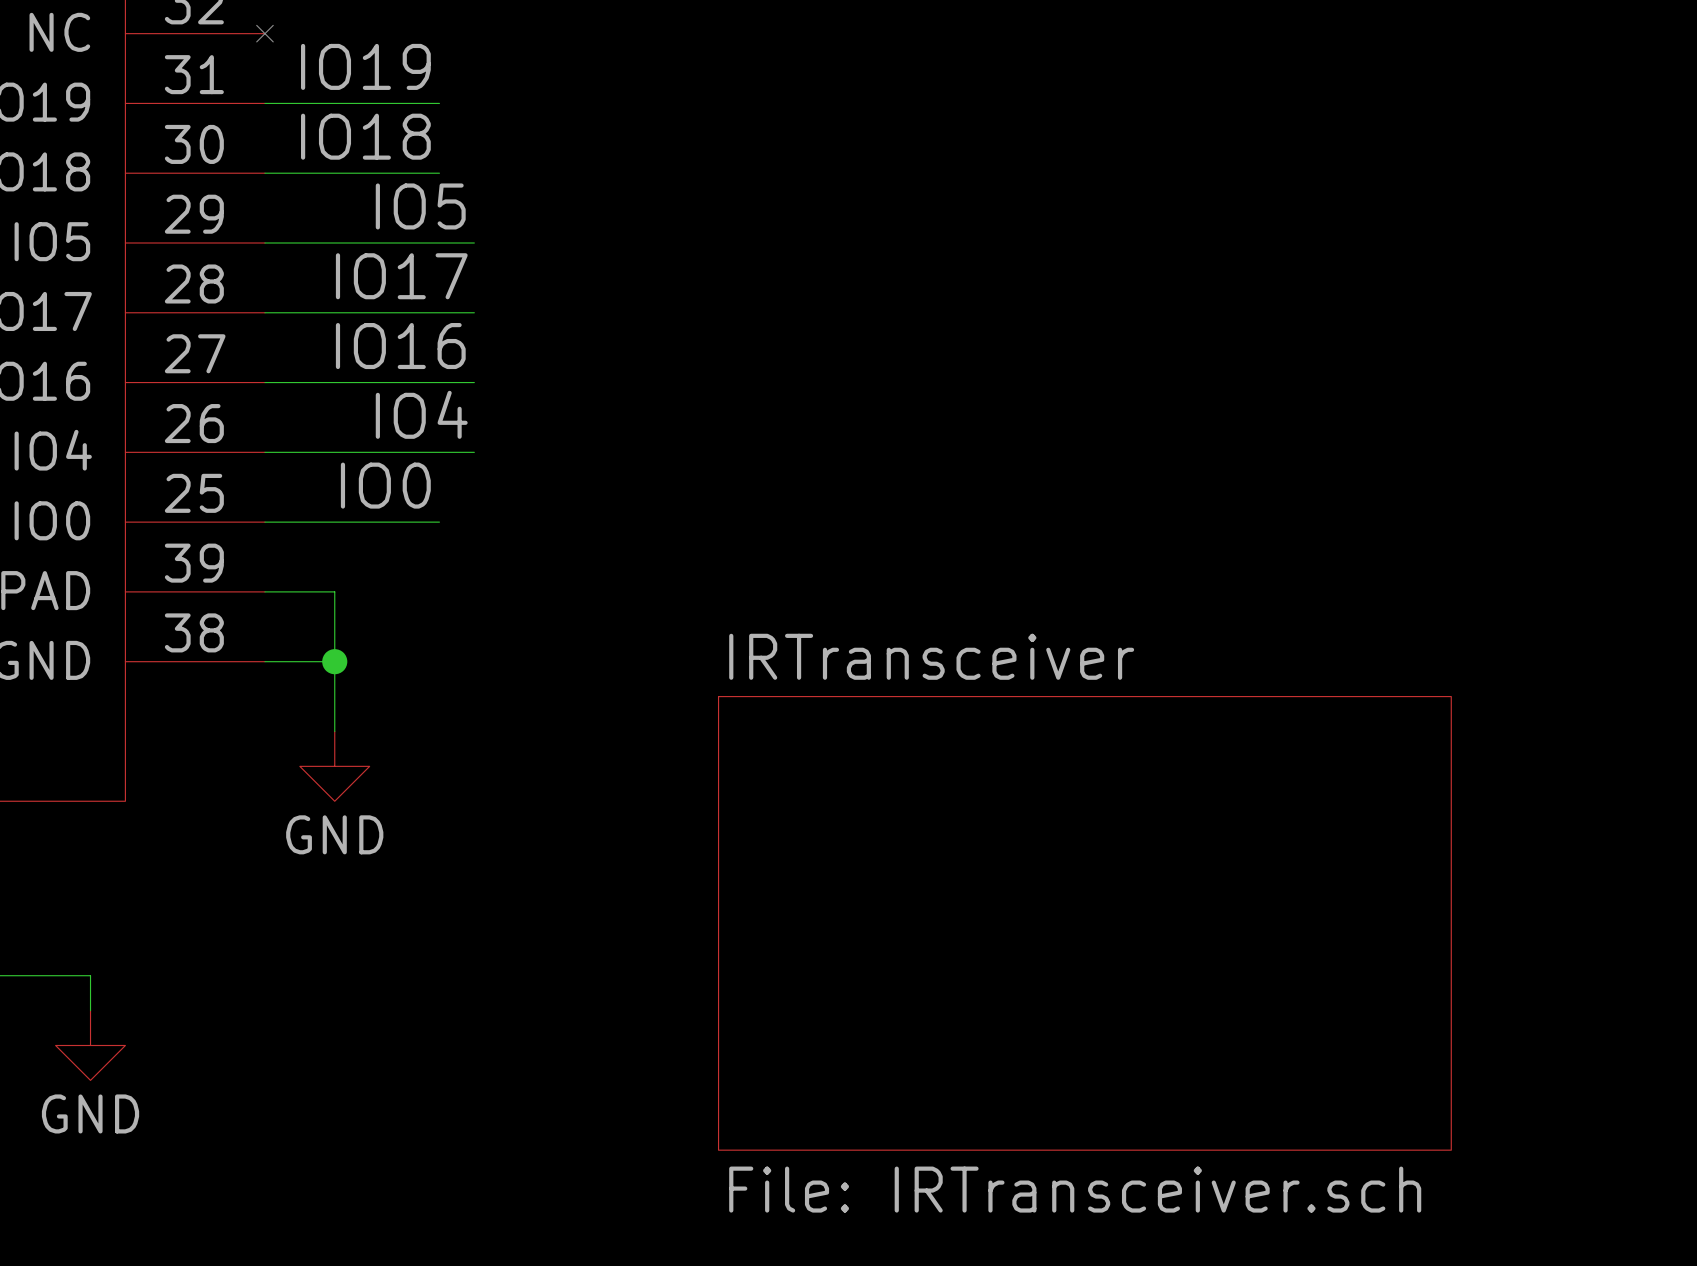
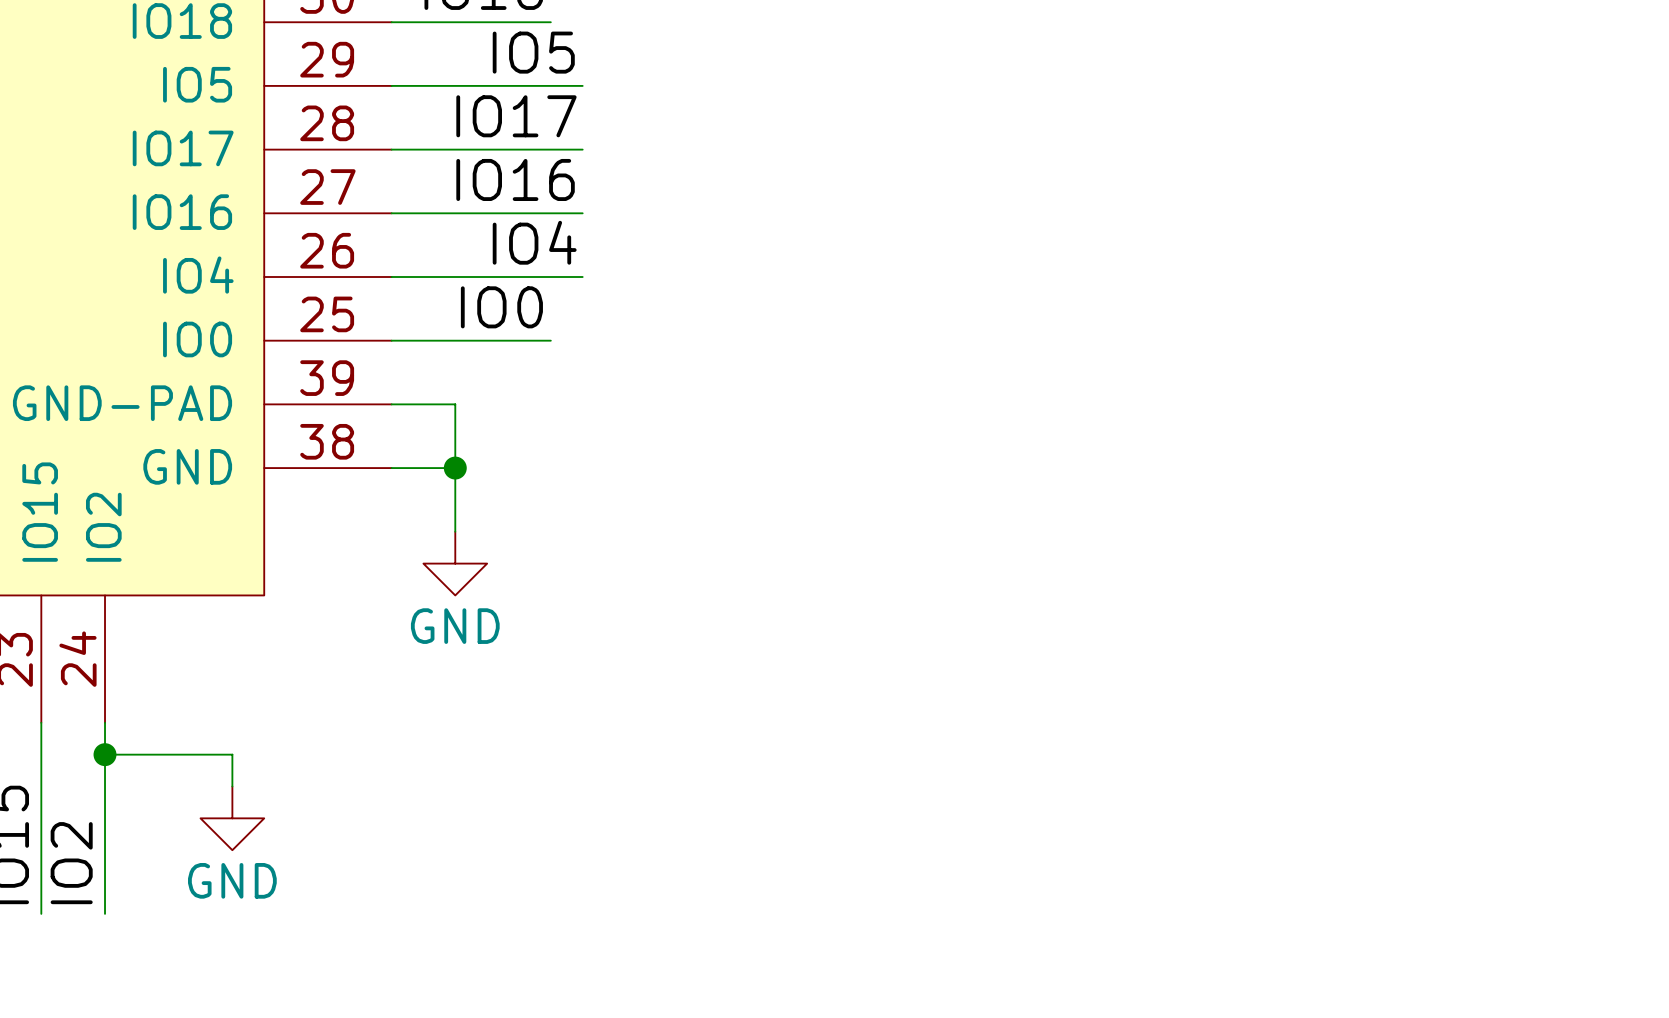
sheet IRTransceiver: File: IRTransceiver.sch (1084, 923) -> none

